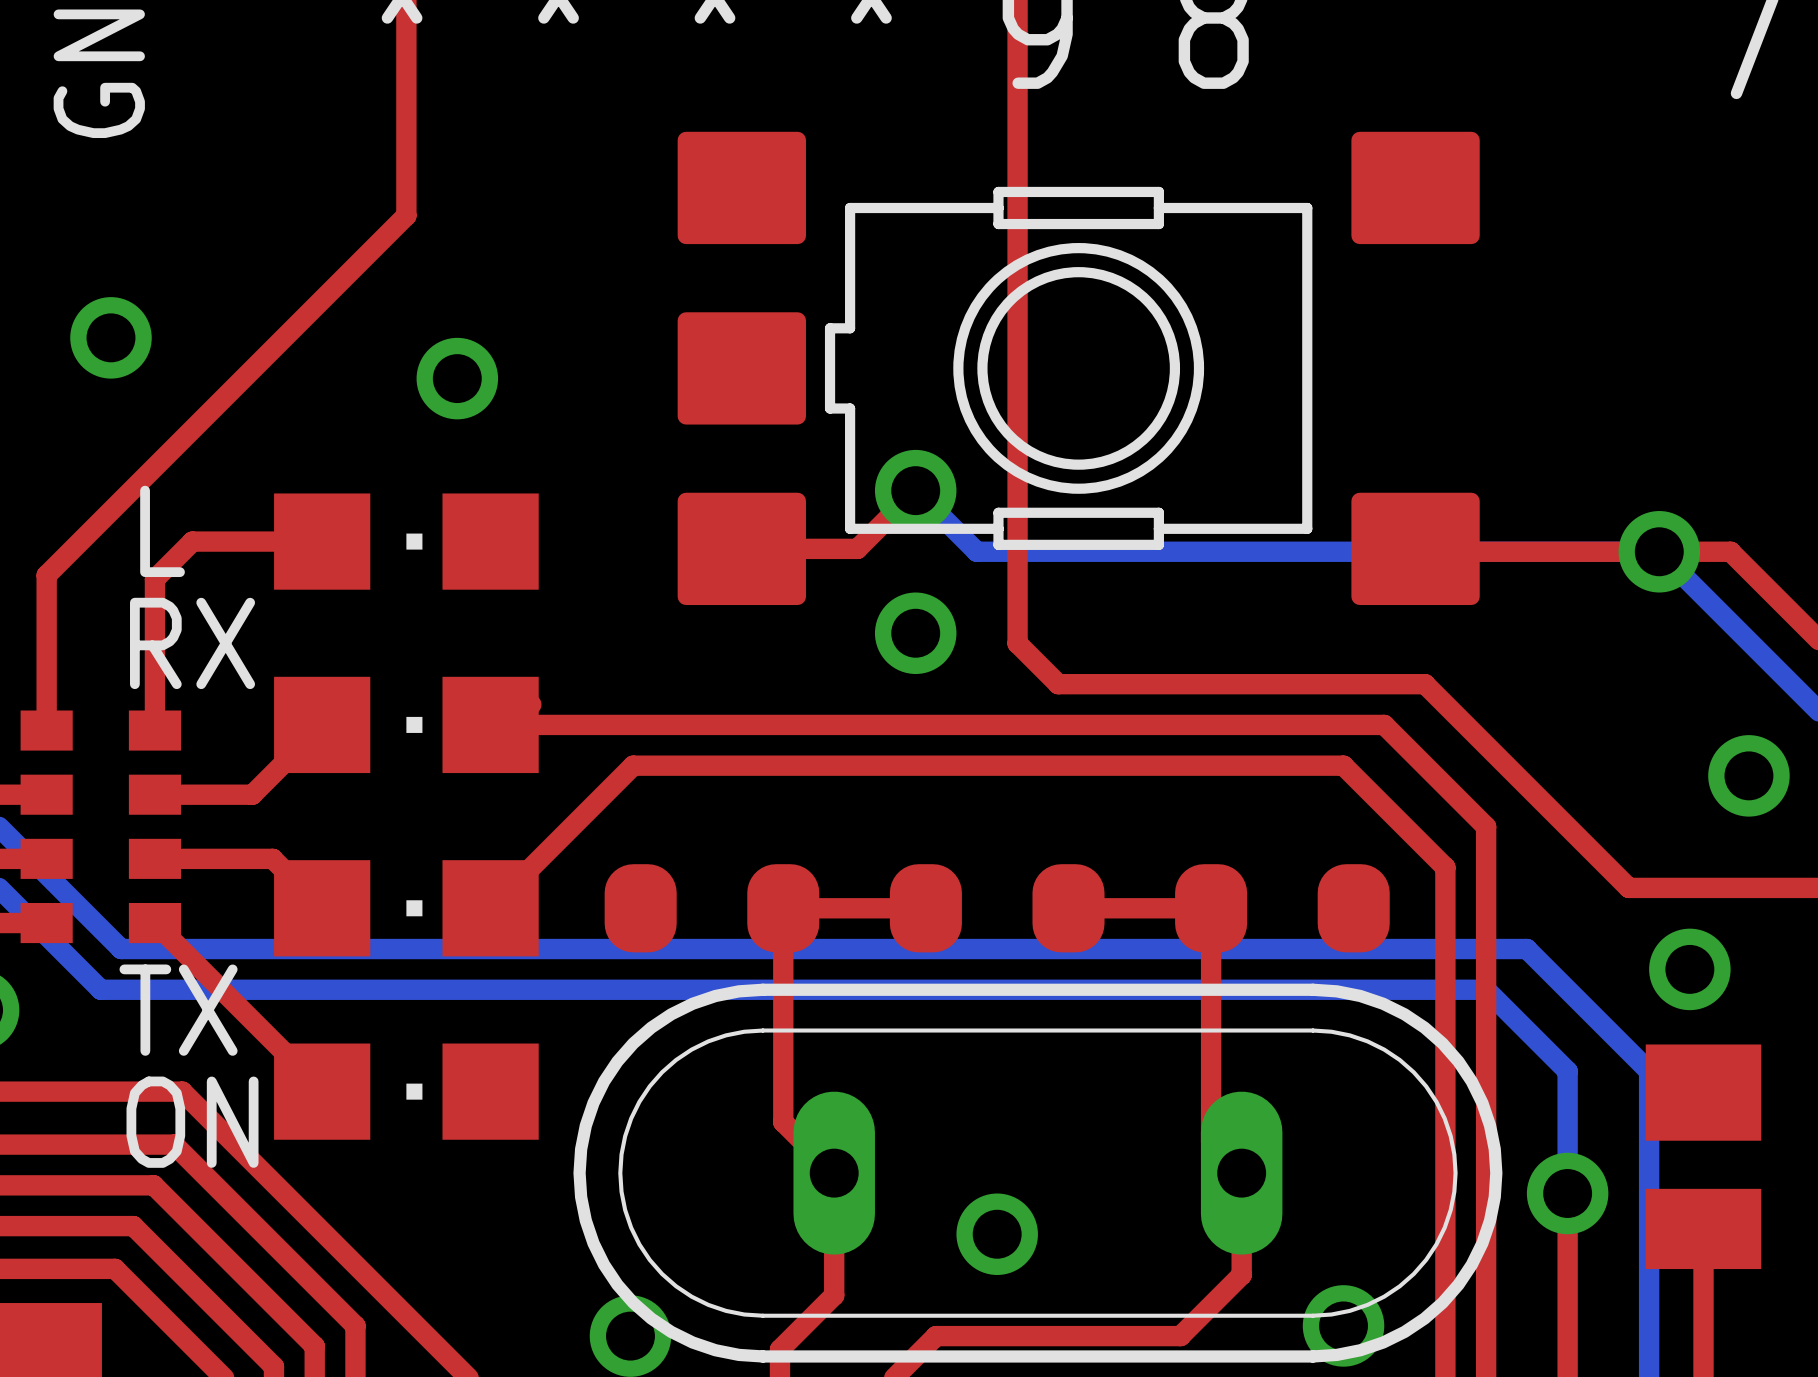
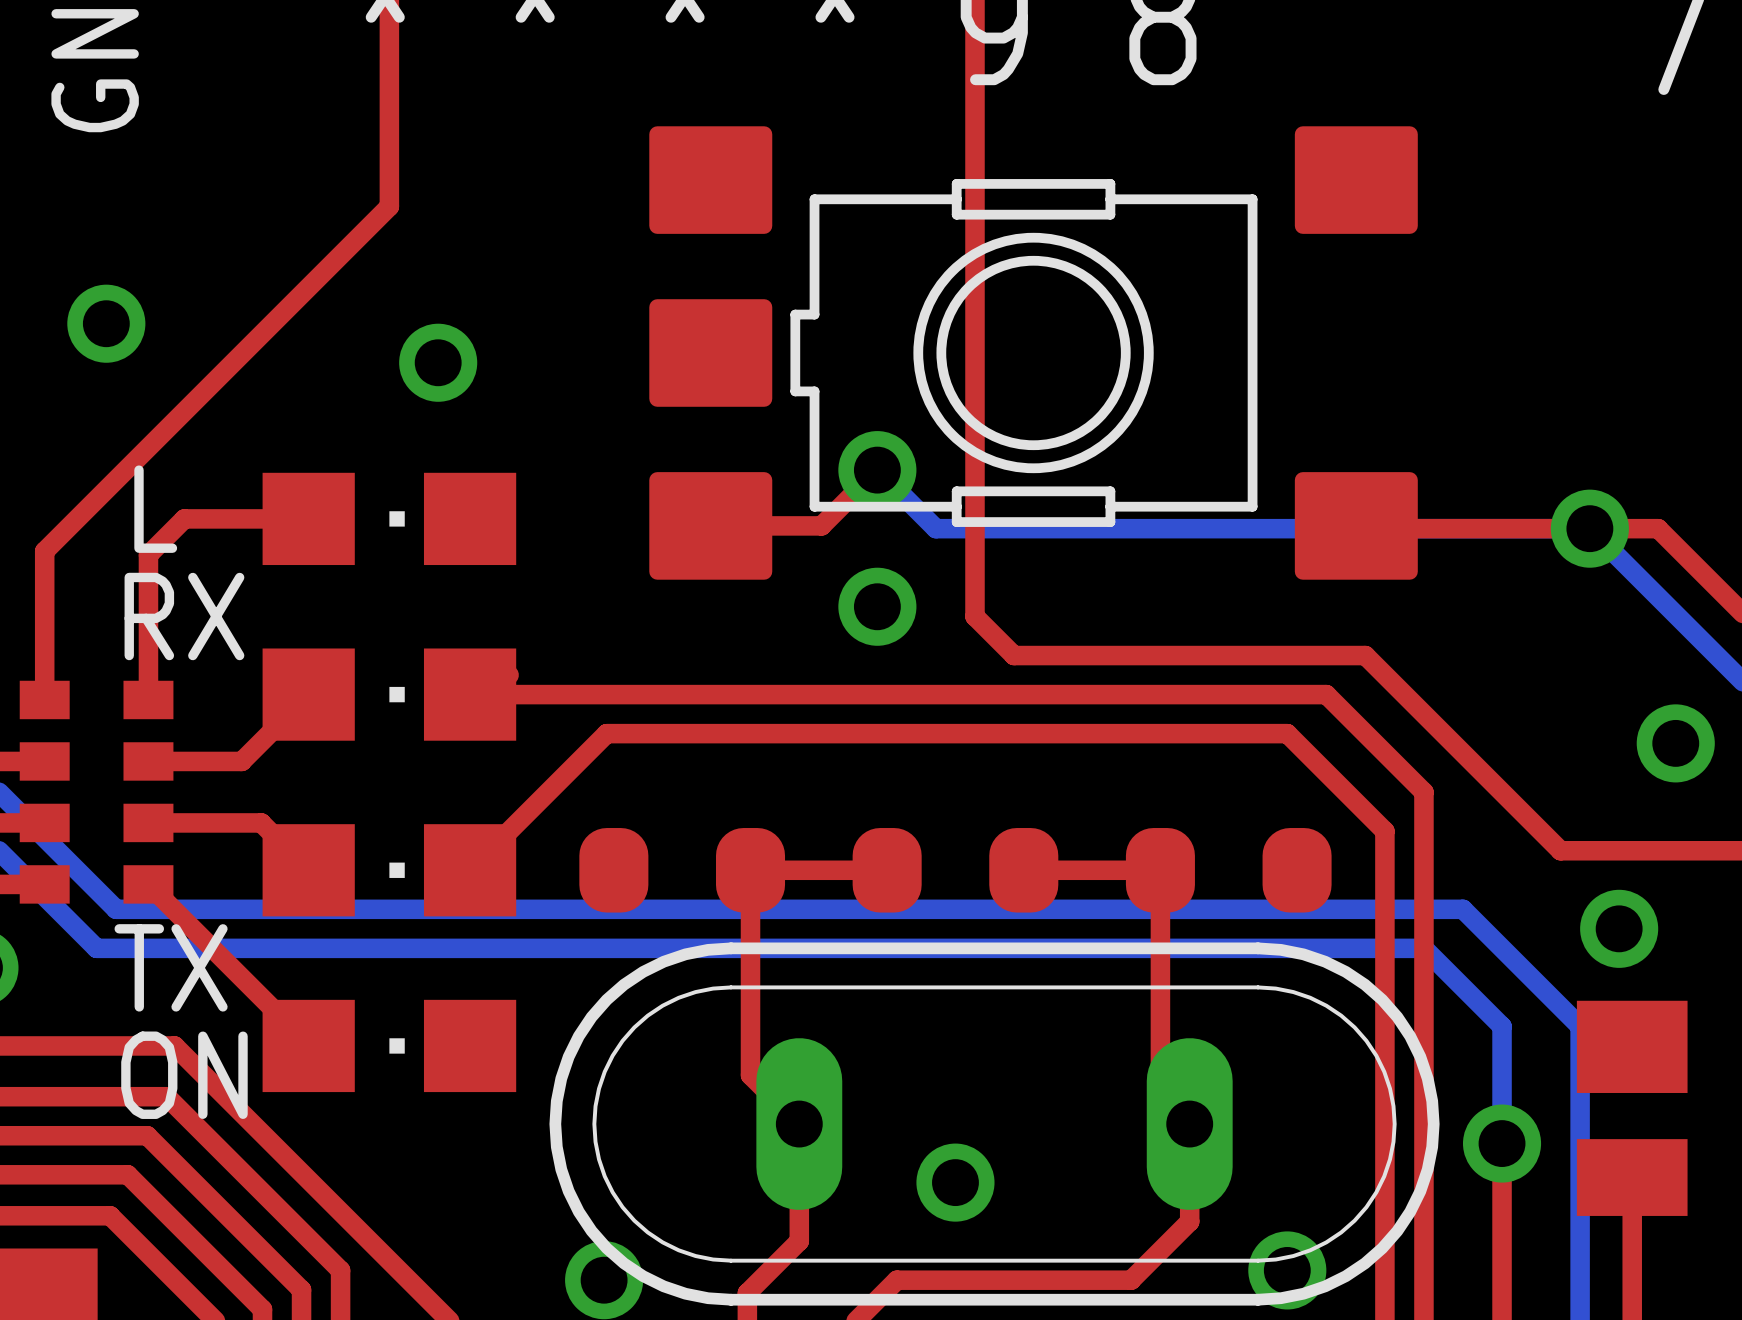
part footprint: [573, 983, 1503, 1363] -> [549, 942, 1440, 1306]

